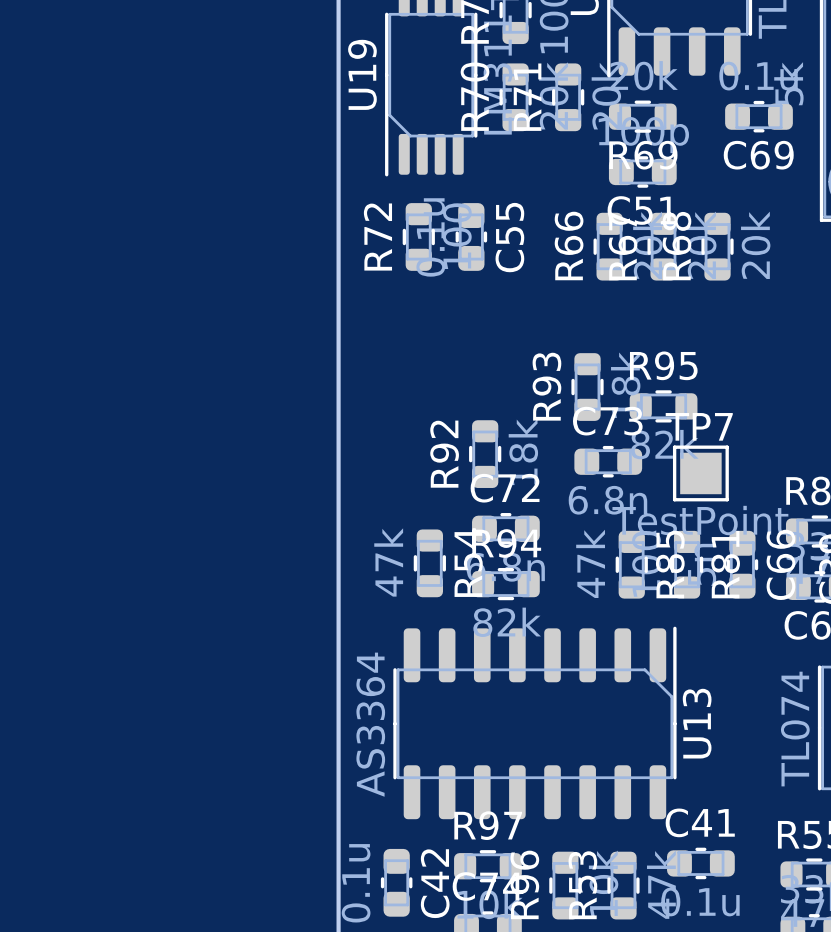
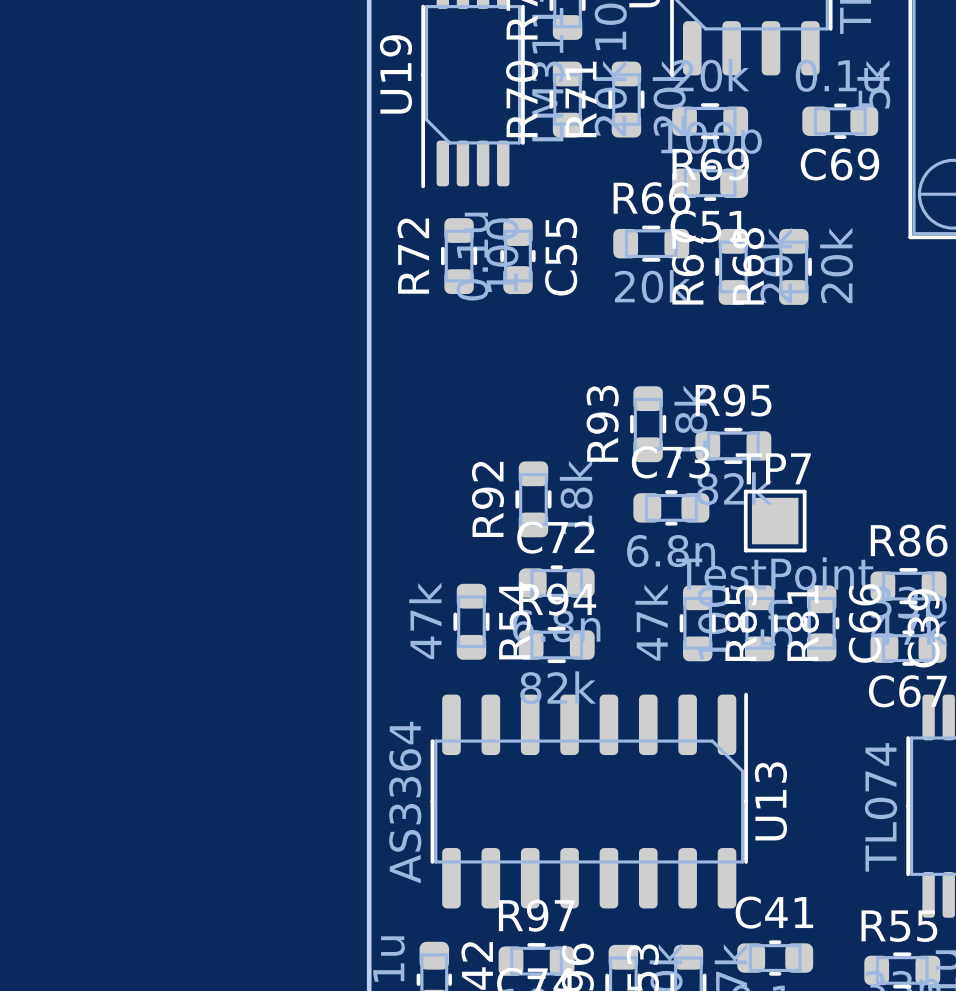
R66 rotation: 0° (609, 246) -> 90° clockwise (651, 243)

